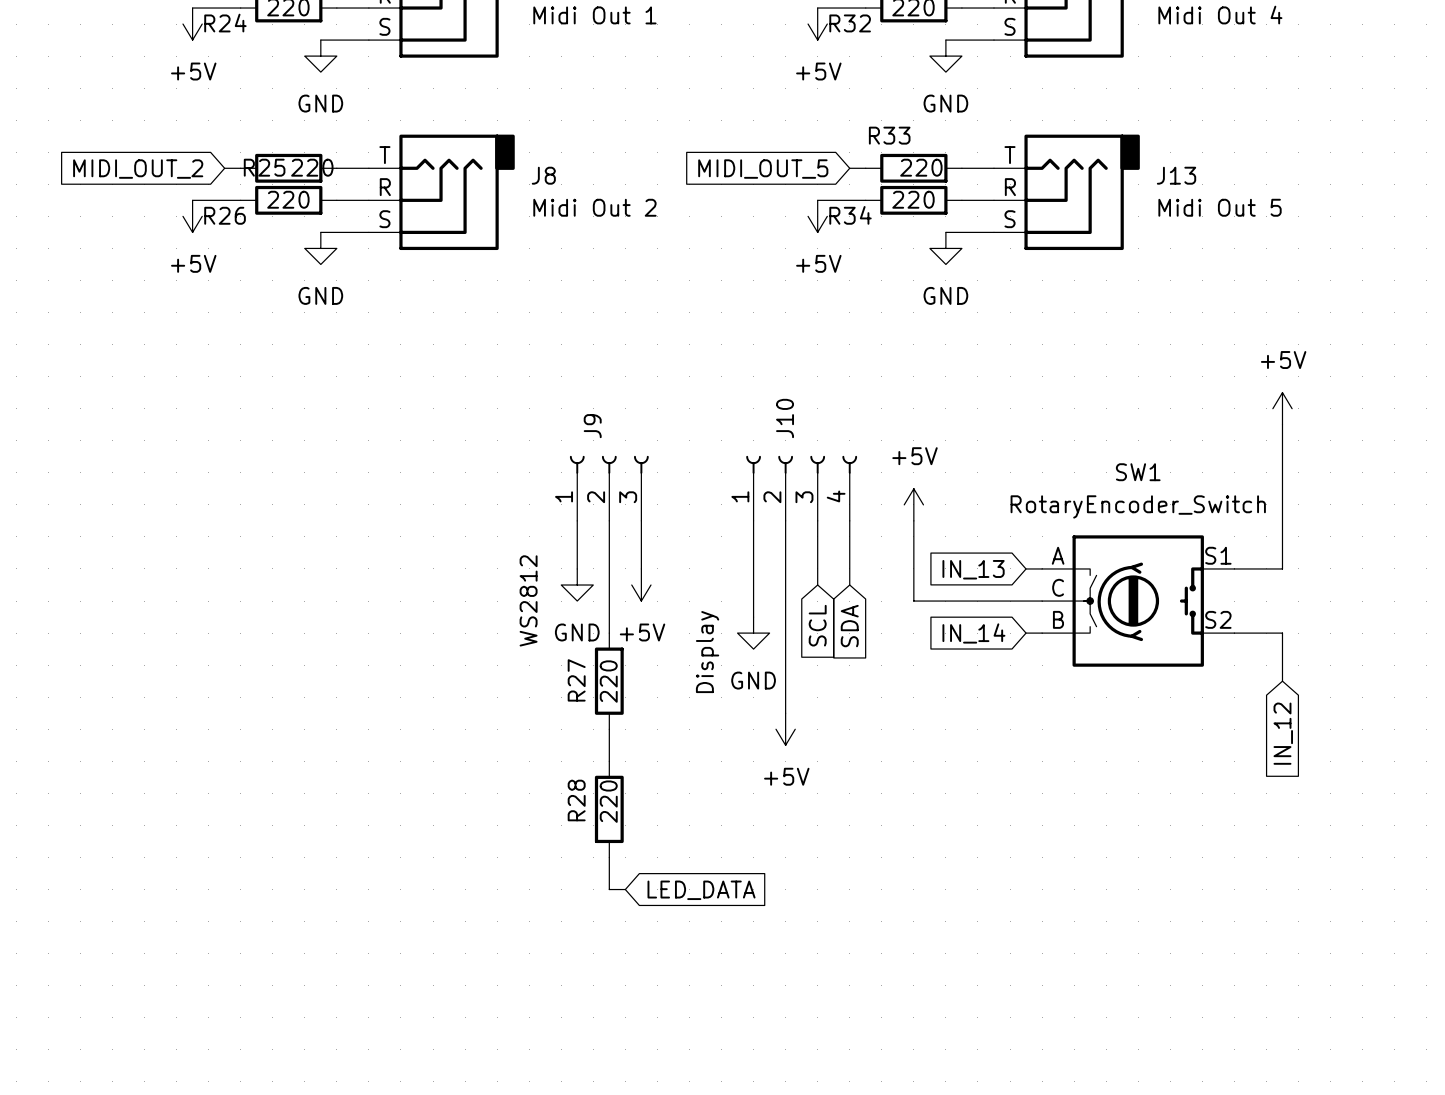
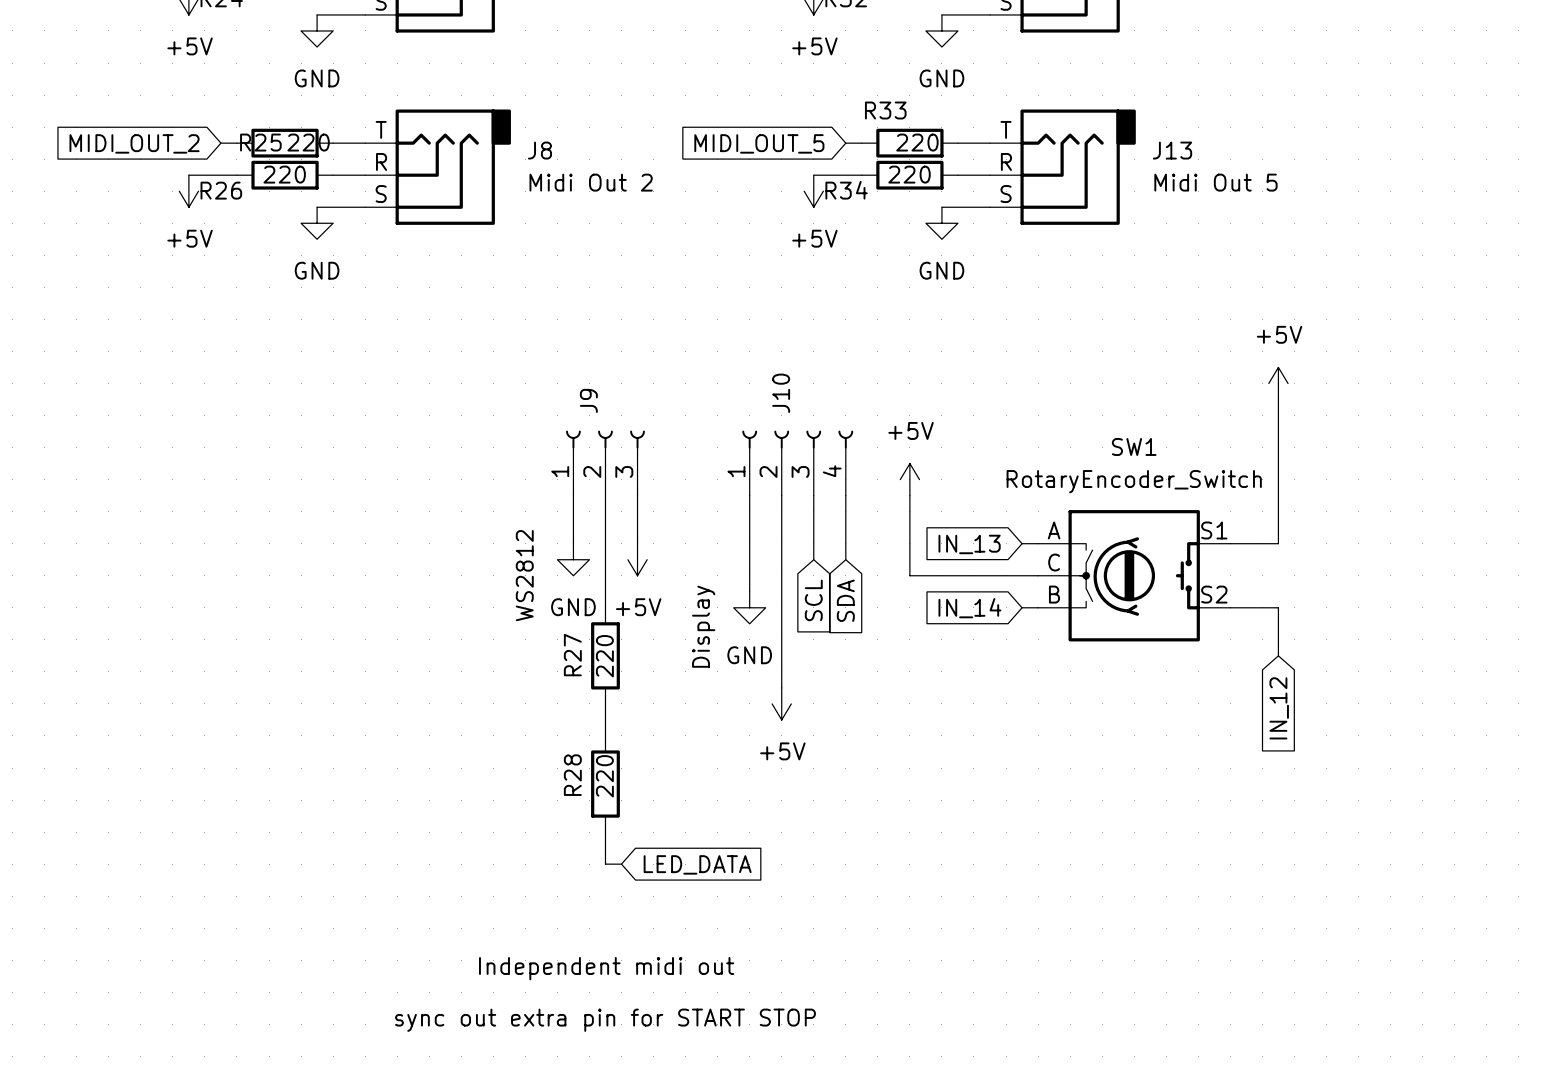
text: none -> Independent midi out (606, 968)
text: none -> sync out extra pin for START STOP (605, 1020)

